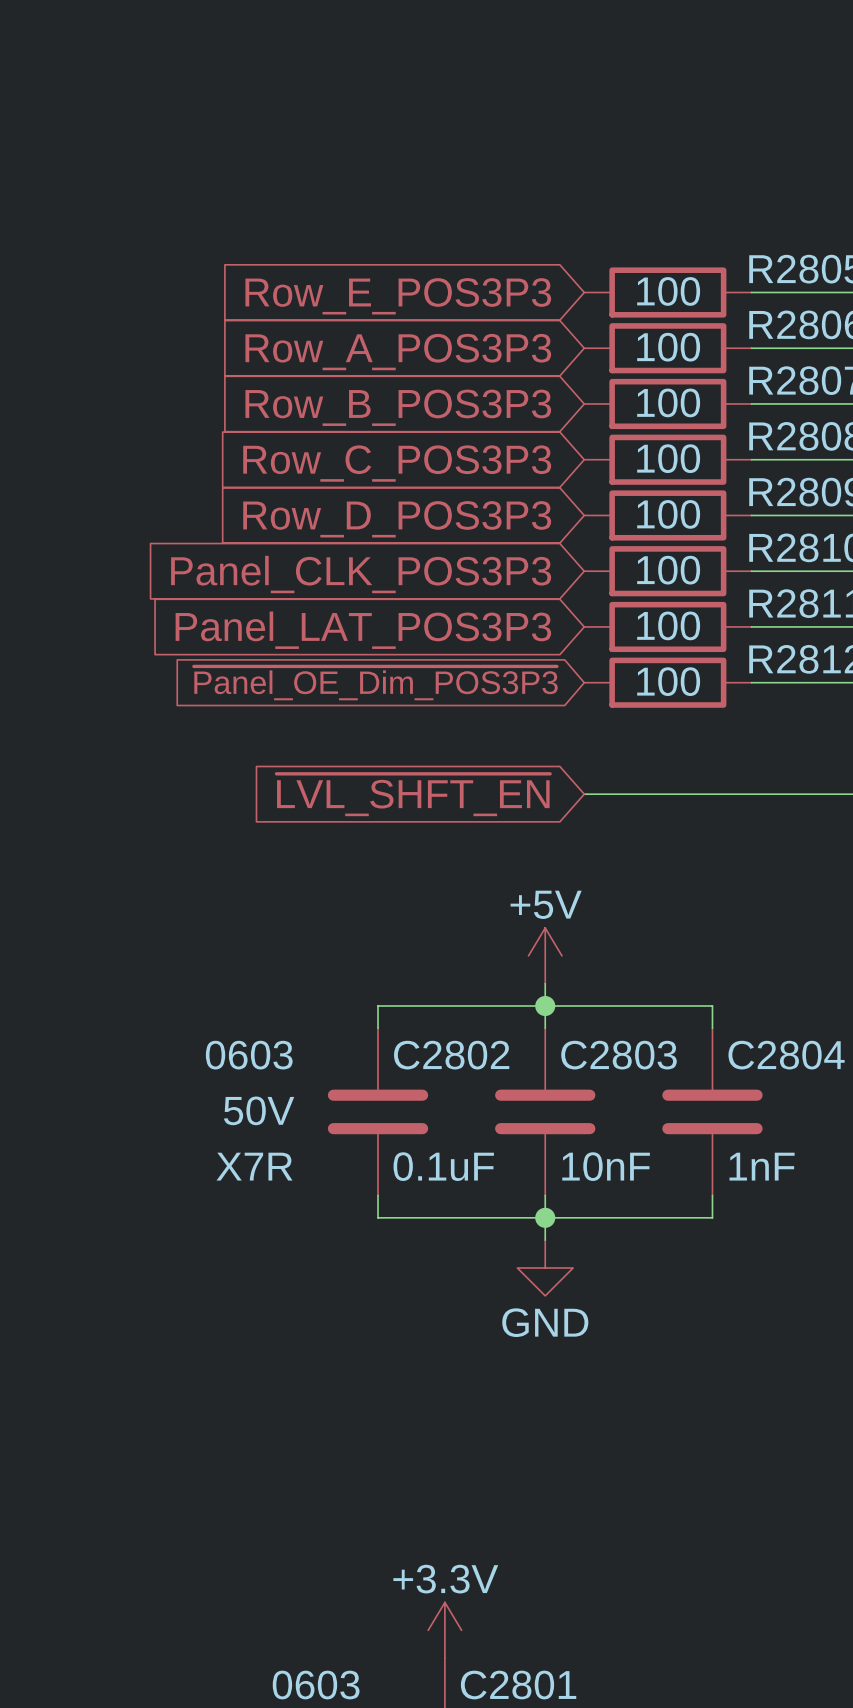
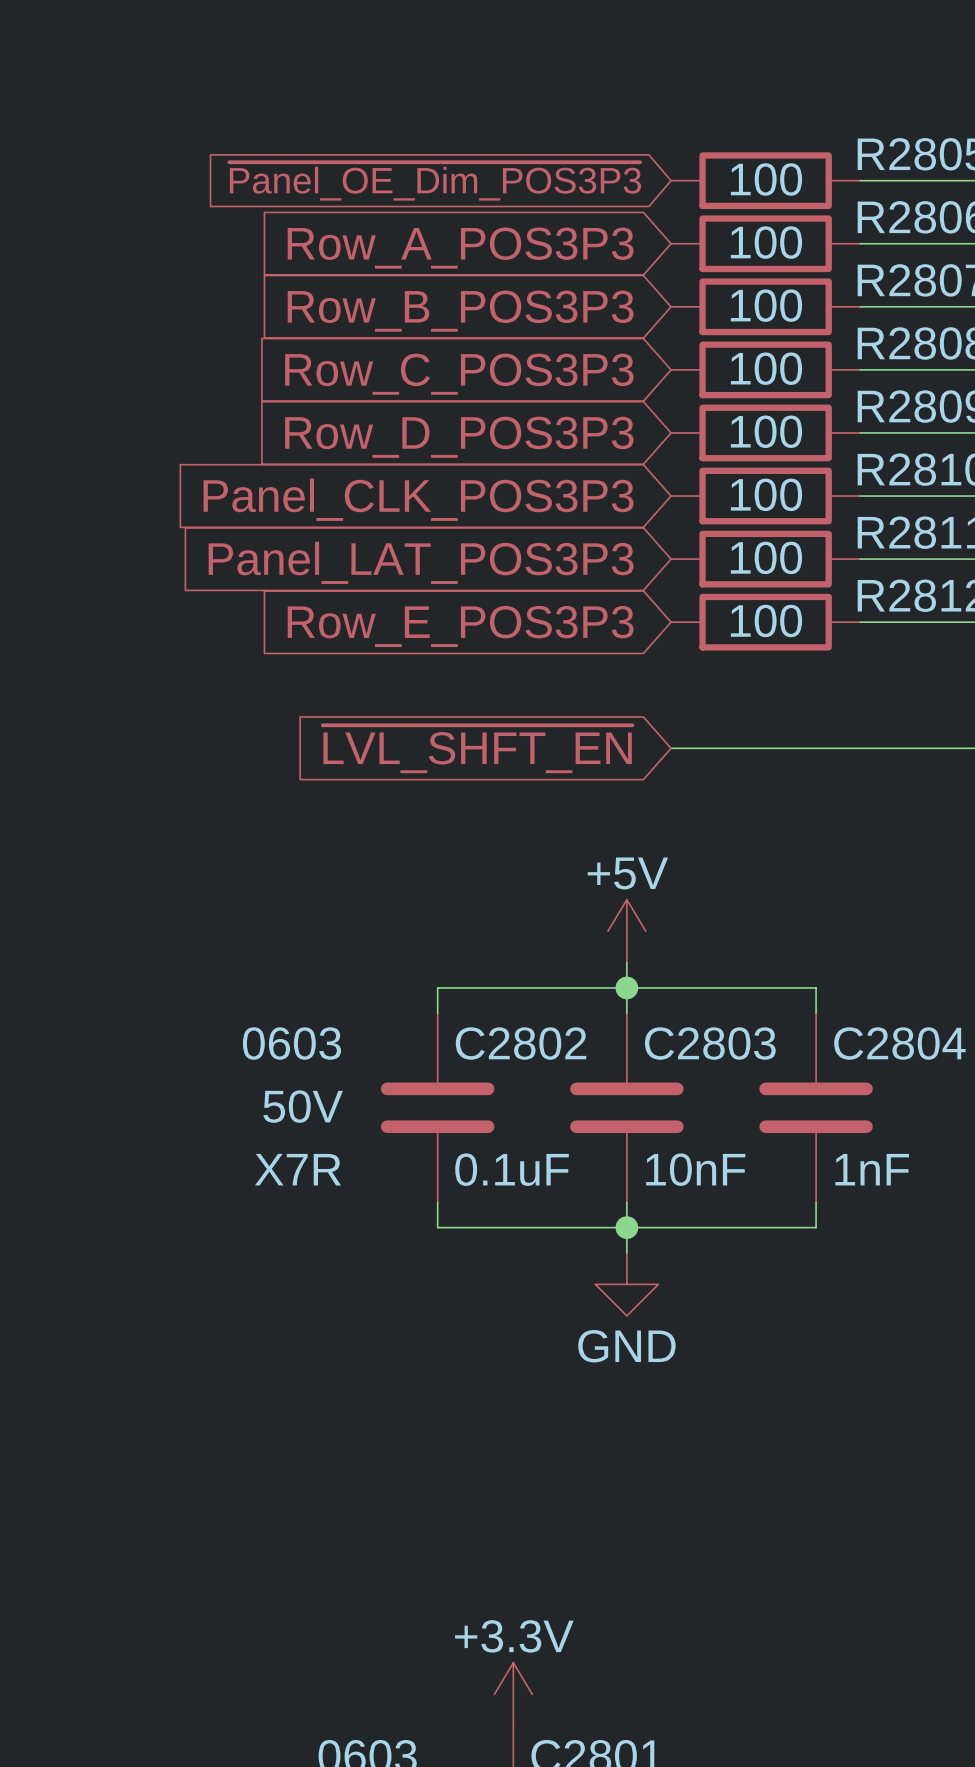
global label: Row_E_POS3P3 (398, 296) -> ~{Panel_OE_Dim_POS3P3} (435, 181)
global label: ~{Panel_OE_Dim_POS3P3} (375, 683) -> Row_E_POS3P3 (460, 626)

